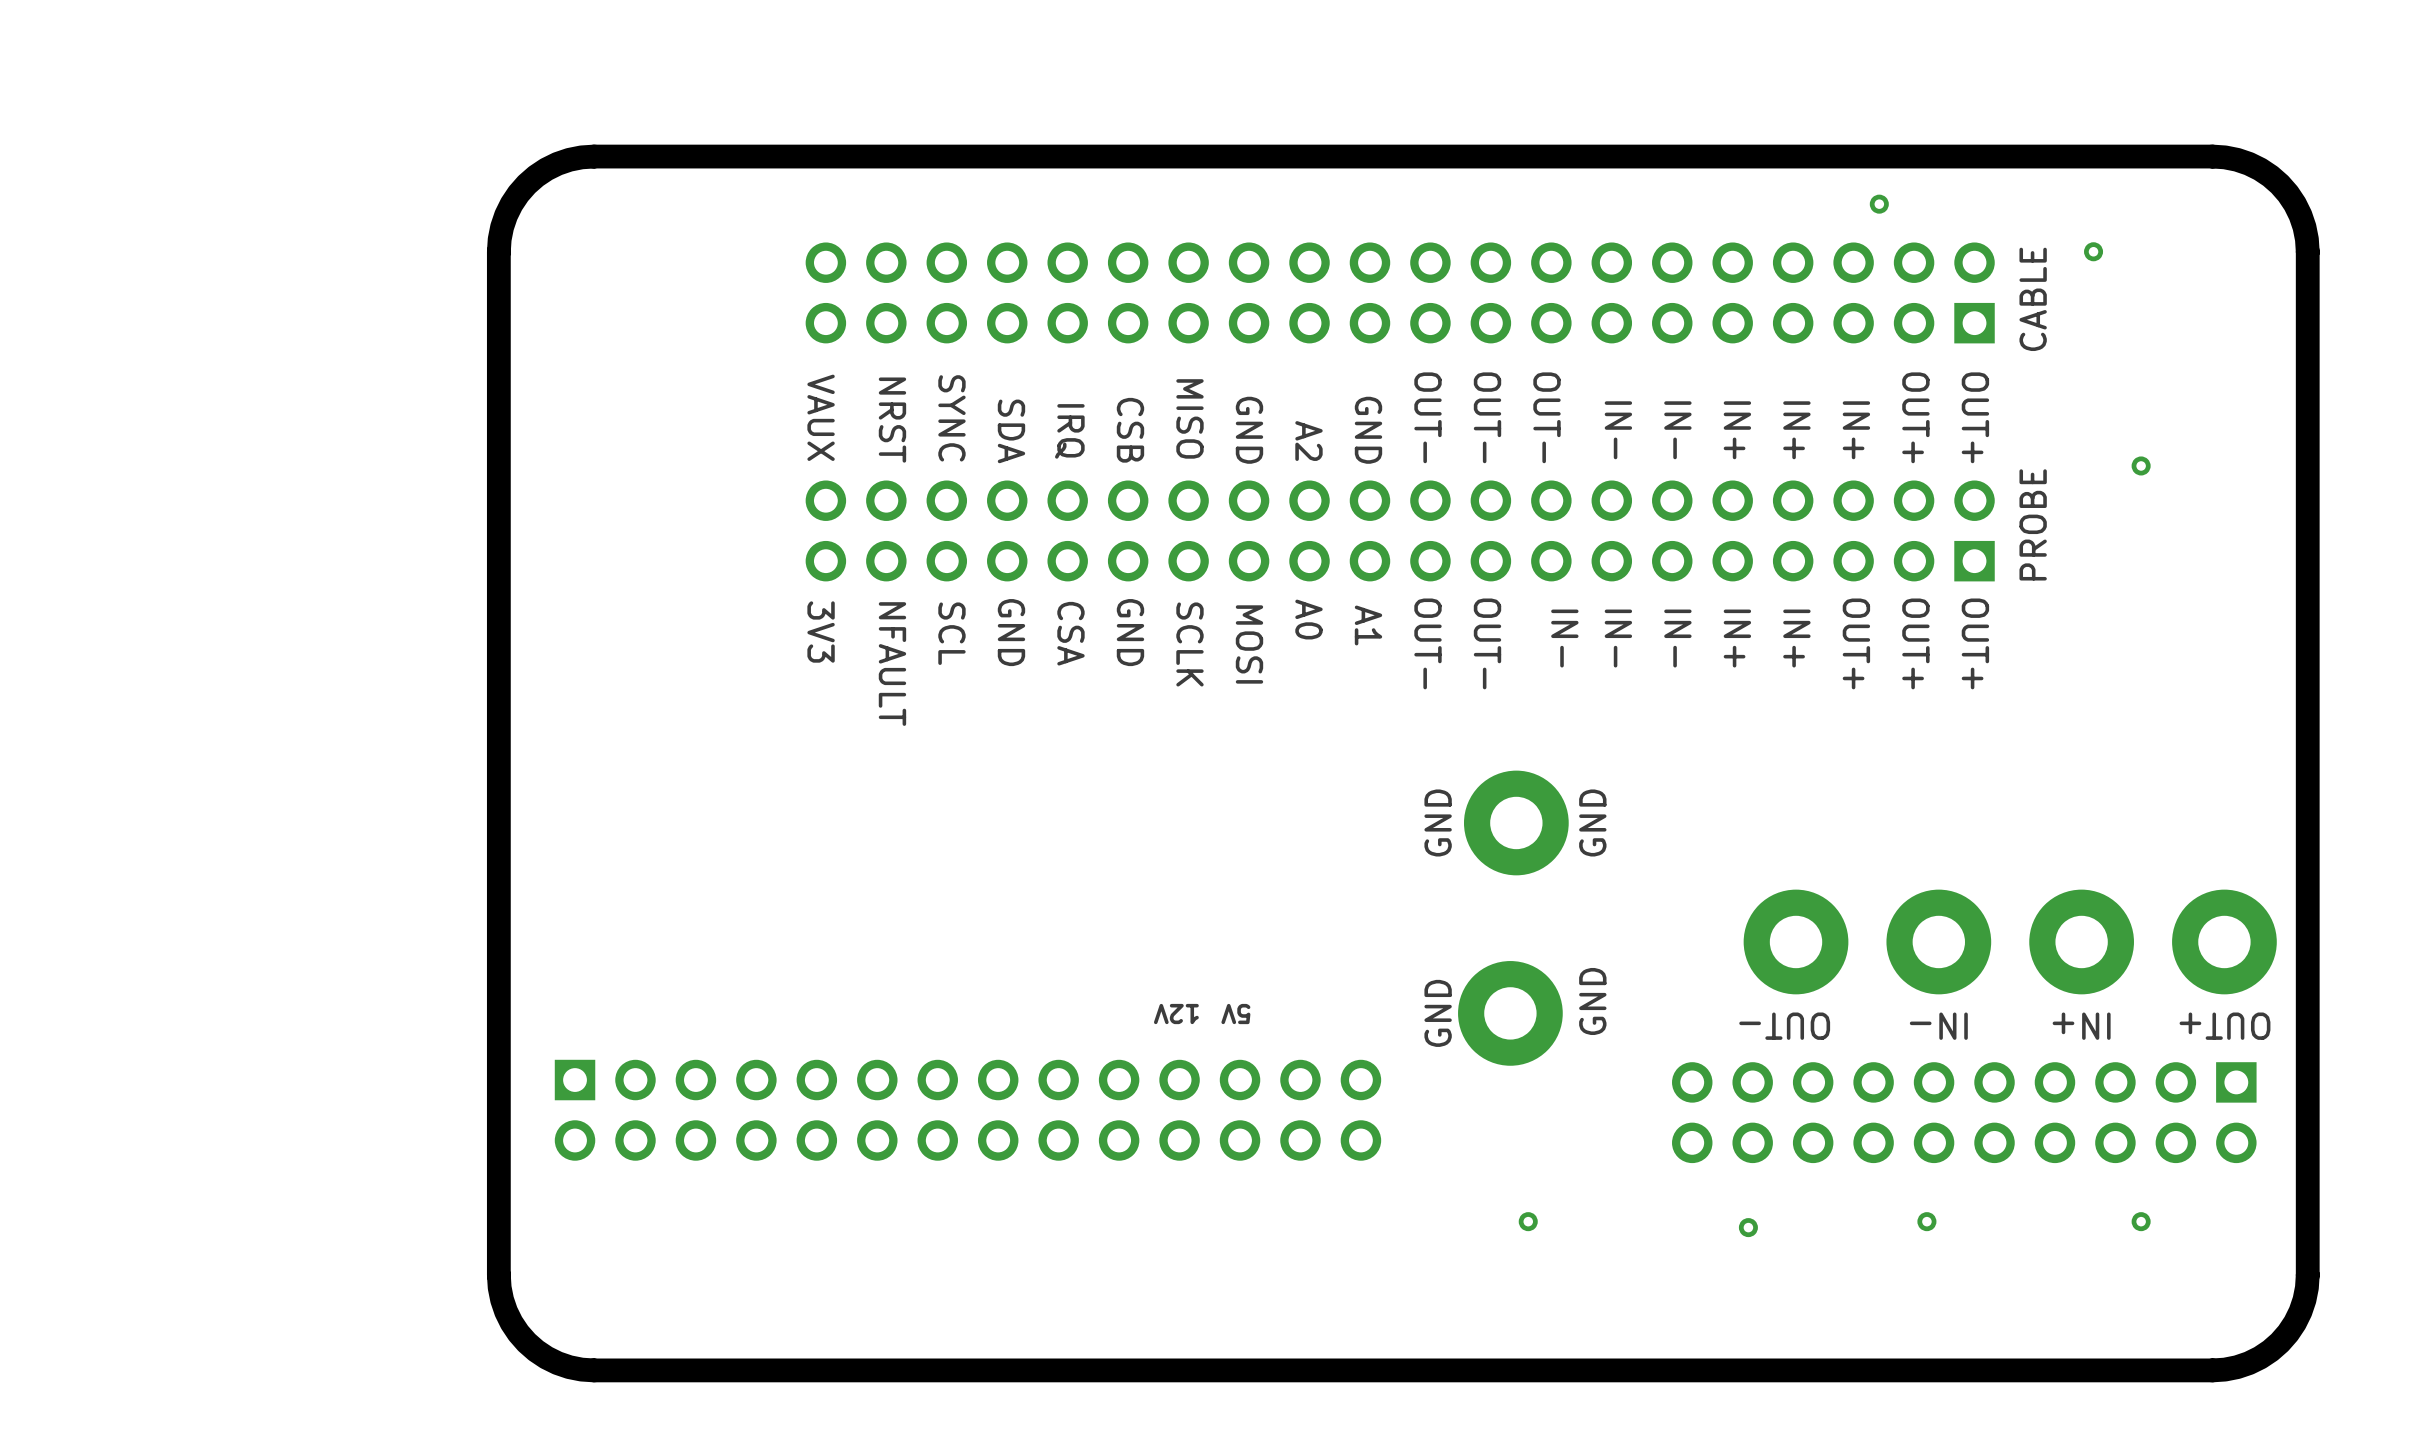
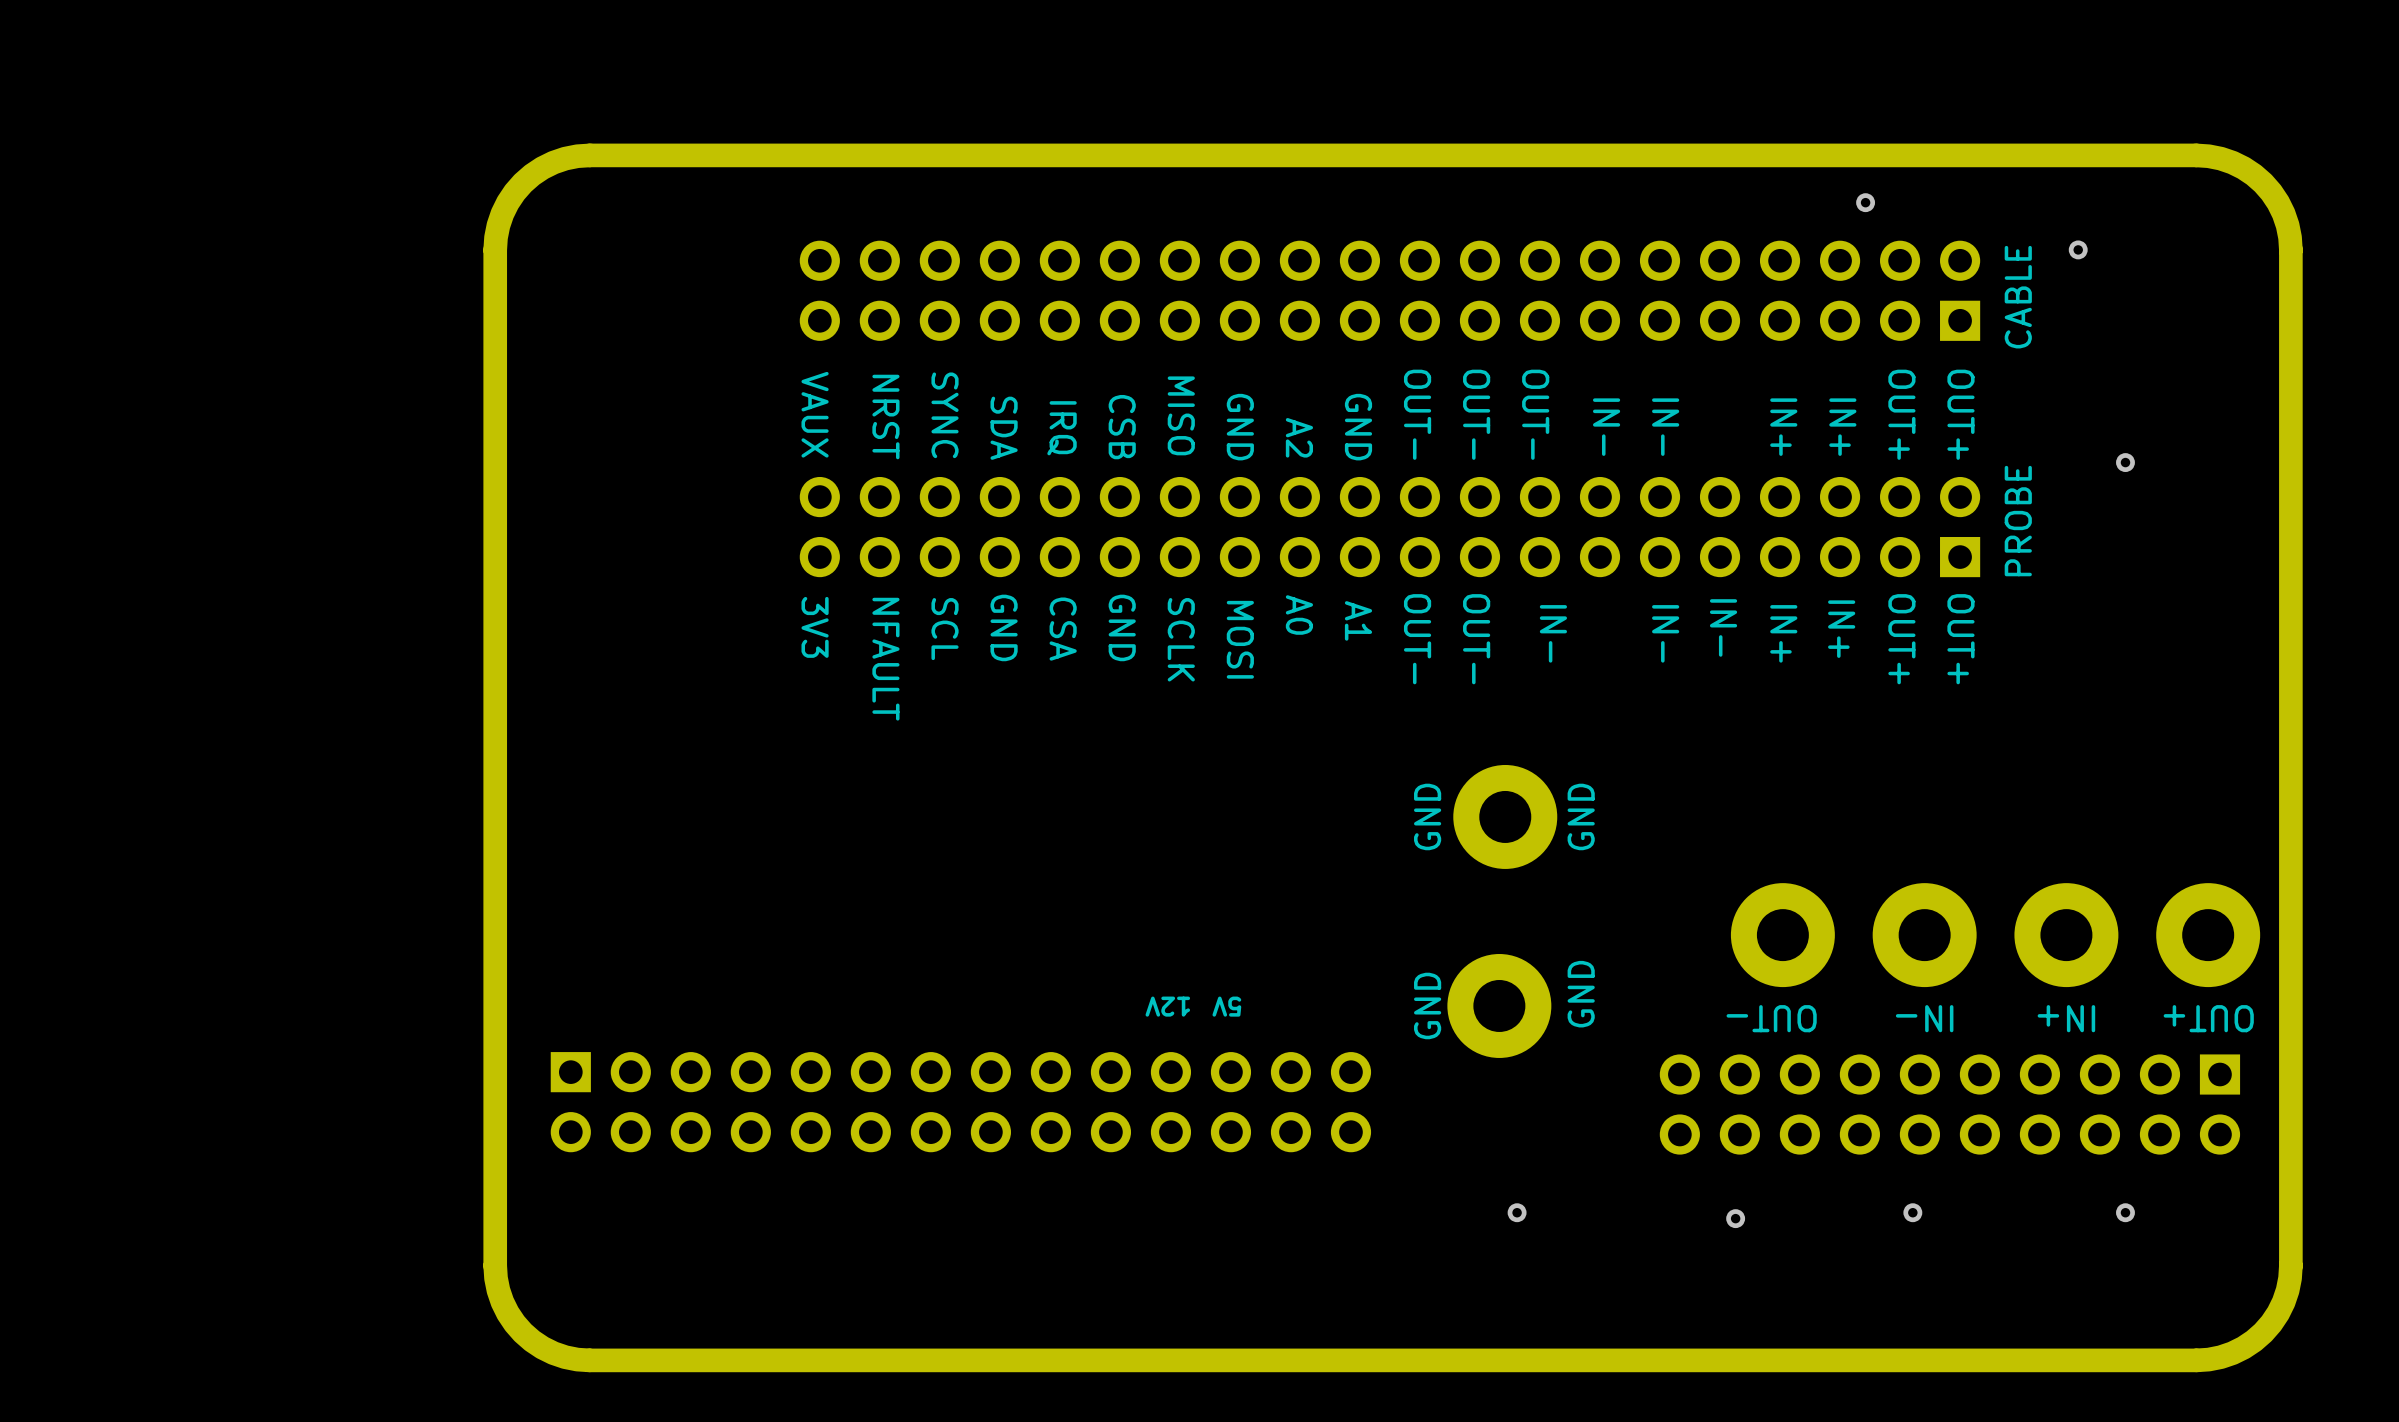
text: IN+ (1737, 430) -> none
text: IN- (1618, 638) -> none
text: IN+ (1737, 638) -> IN- (1723, 627)
text: OUT+ (1856, 643) -> IN+ (1841, 629)

